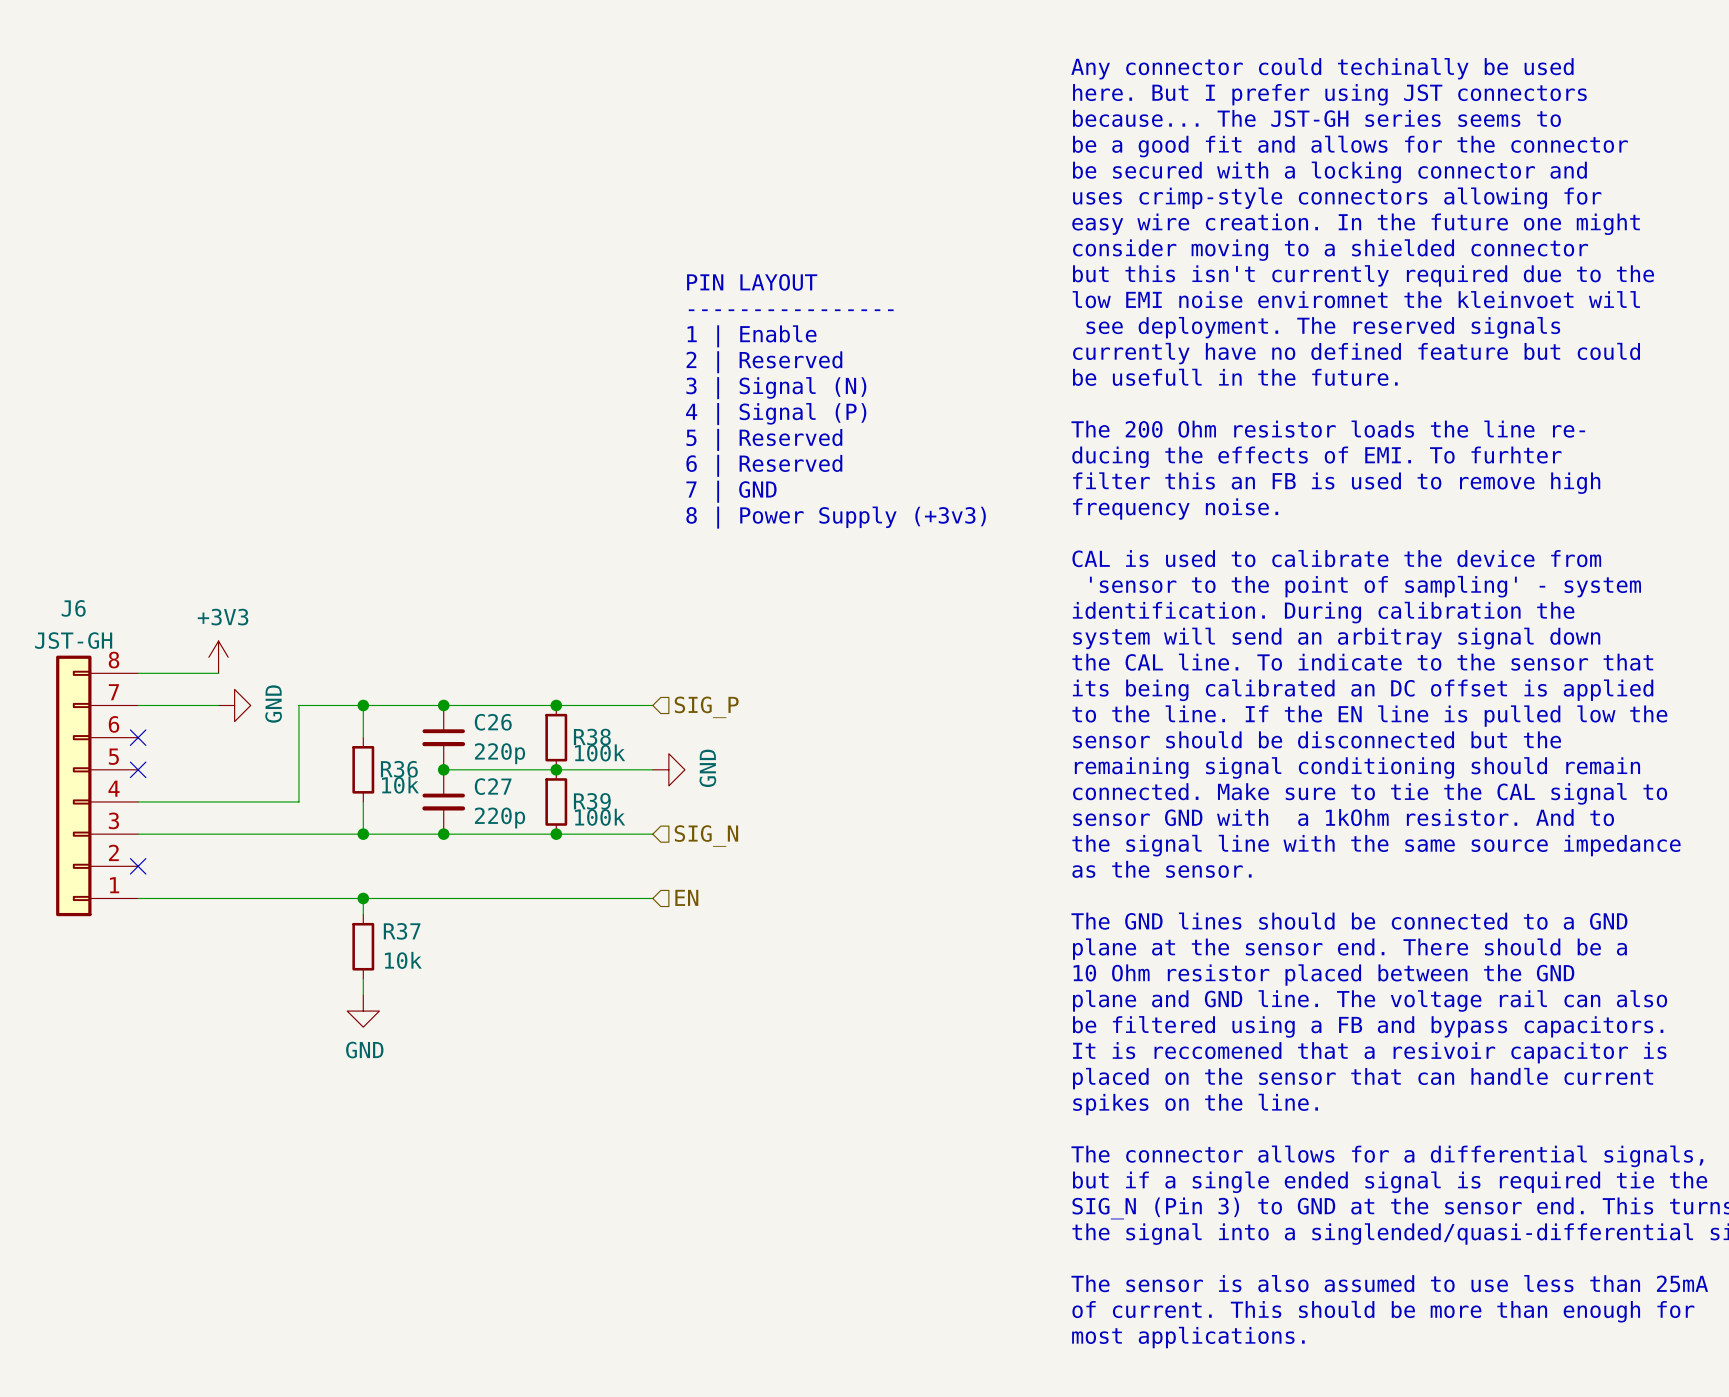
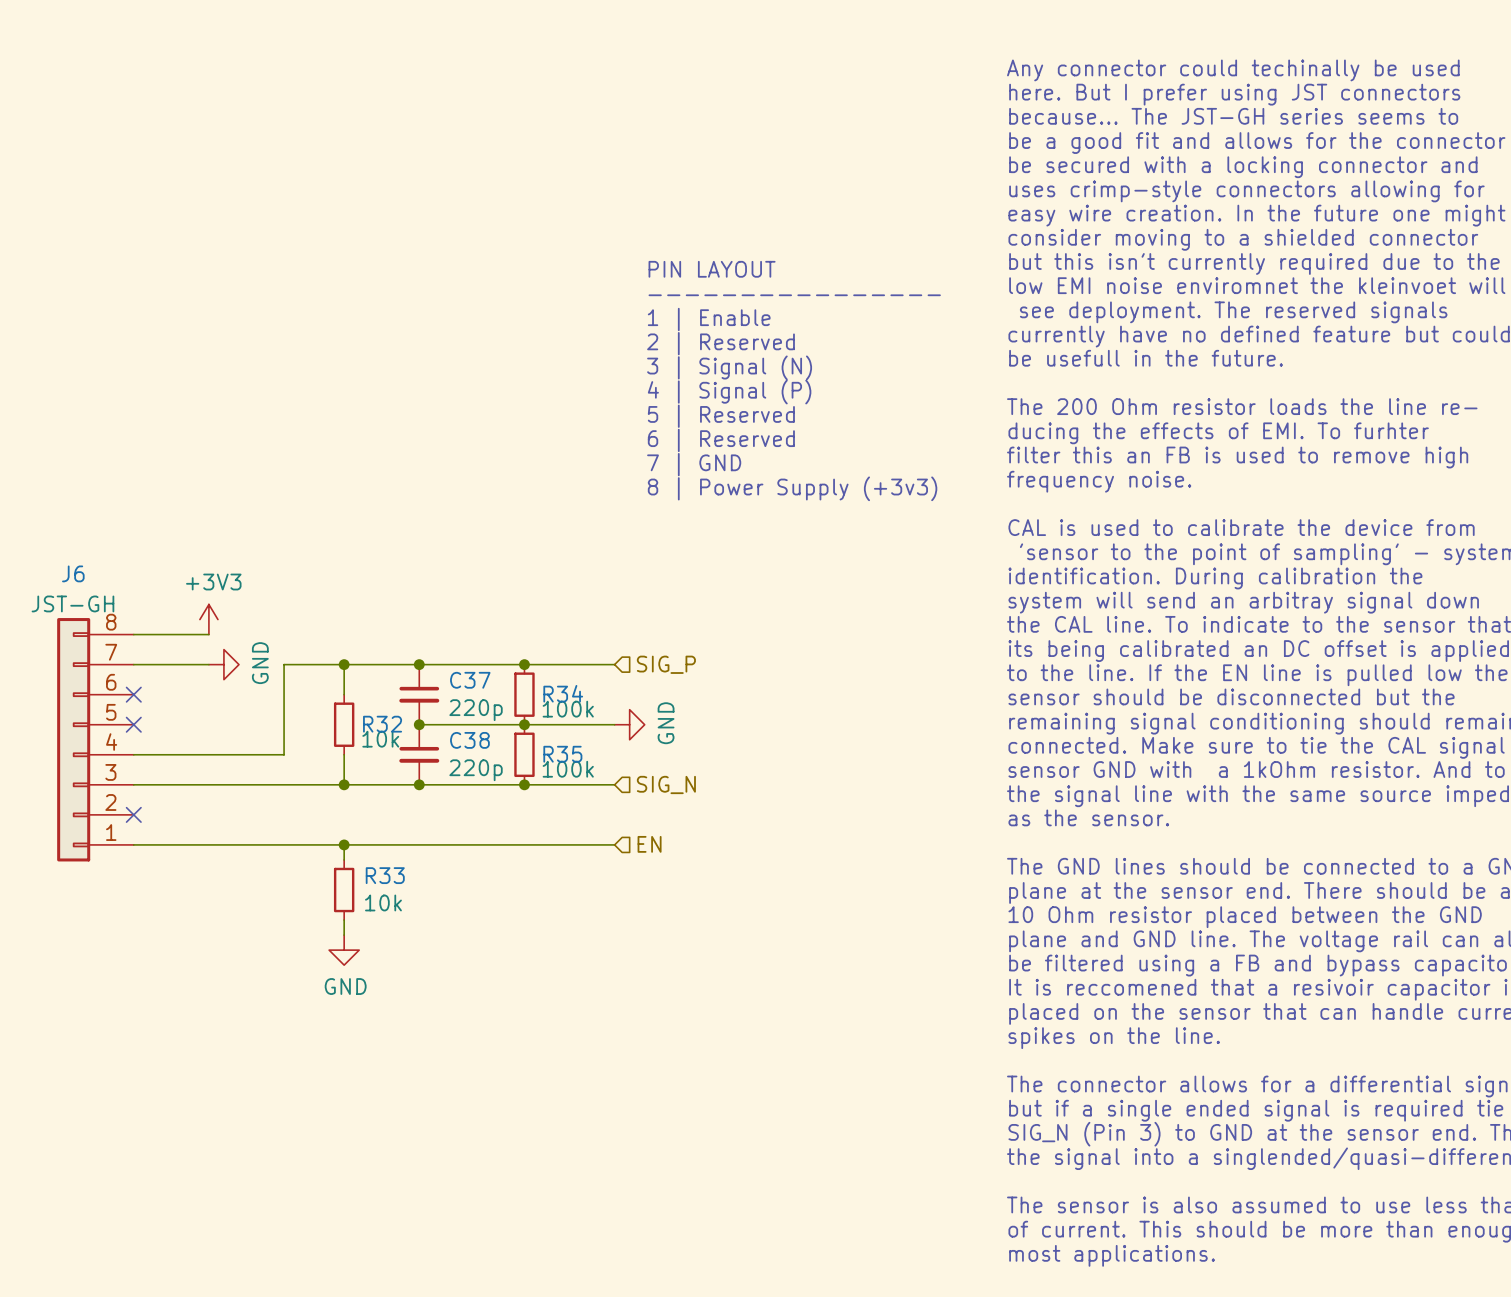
C26 name: C26 (493, 722) -> C37 (470, 680)
R38 name: R38 (592, 737) -> R34 (563, 693)
R36 name: R36 (399, 769) -> R32 (382, 724)
C27 name: C27 (493, 786) -> C38 (469, 740)
R39 name: R39 (592, 801) -> R35 (562, 754)
R37 name: R37 (402, 931) -> R33 (385, 875)

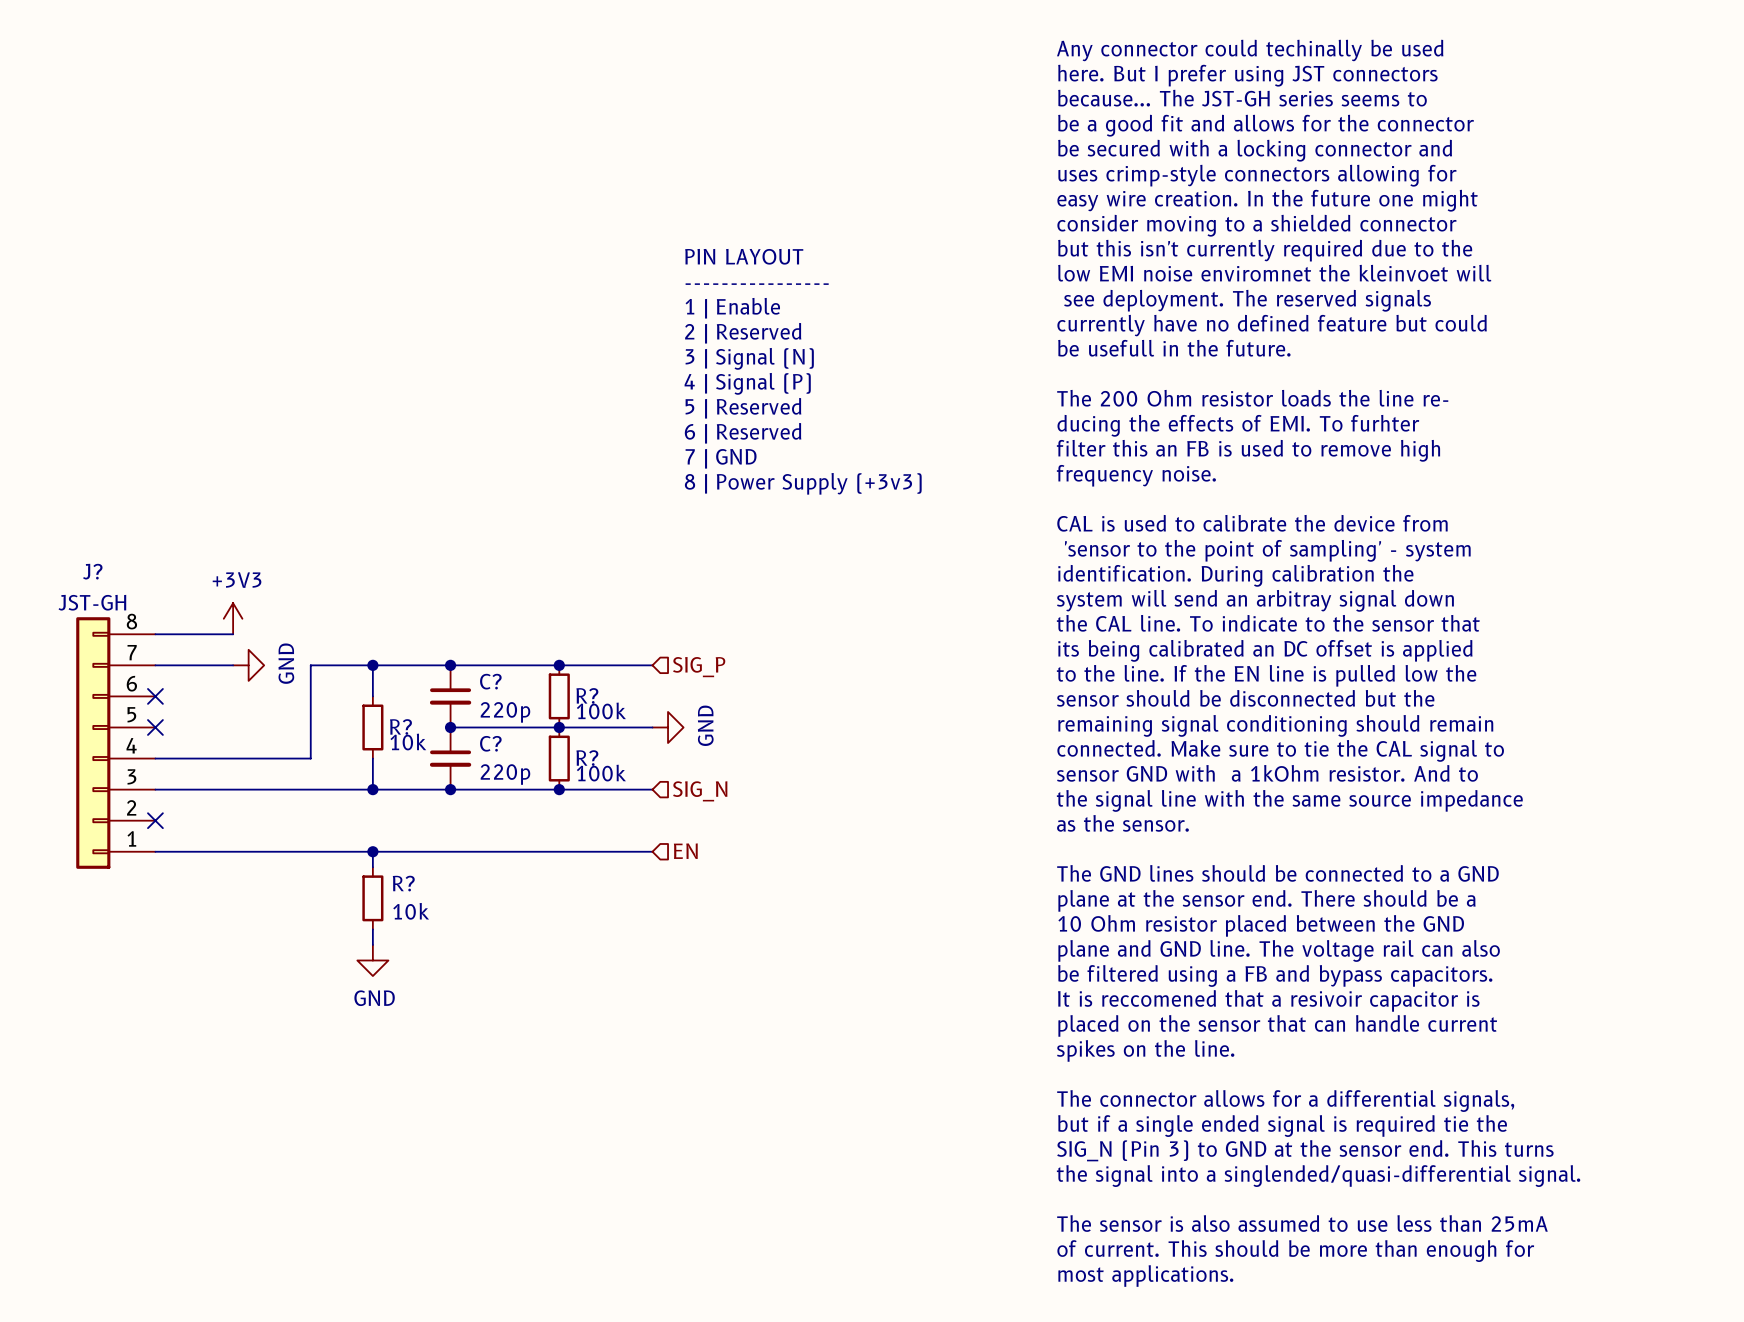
J6 name: J6 (73, 573) -> J? (92, 571)
C37 name: C37 (470, 680) -> C? (490, 681)
R34 name: R34 (563, 693) -> R? (587, 695)
R32 name: R32 (382, 724) -> R? (400, 726)
C38 name: C38 (469, 740) -> C? (490, 743)
R35 name: R35 (562, 754) -> R? (587, 758)
R33 name: R33 (385, 875) -> R? (403, 883)

